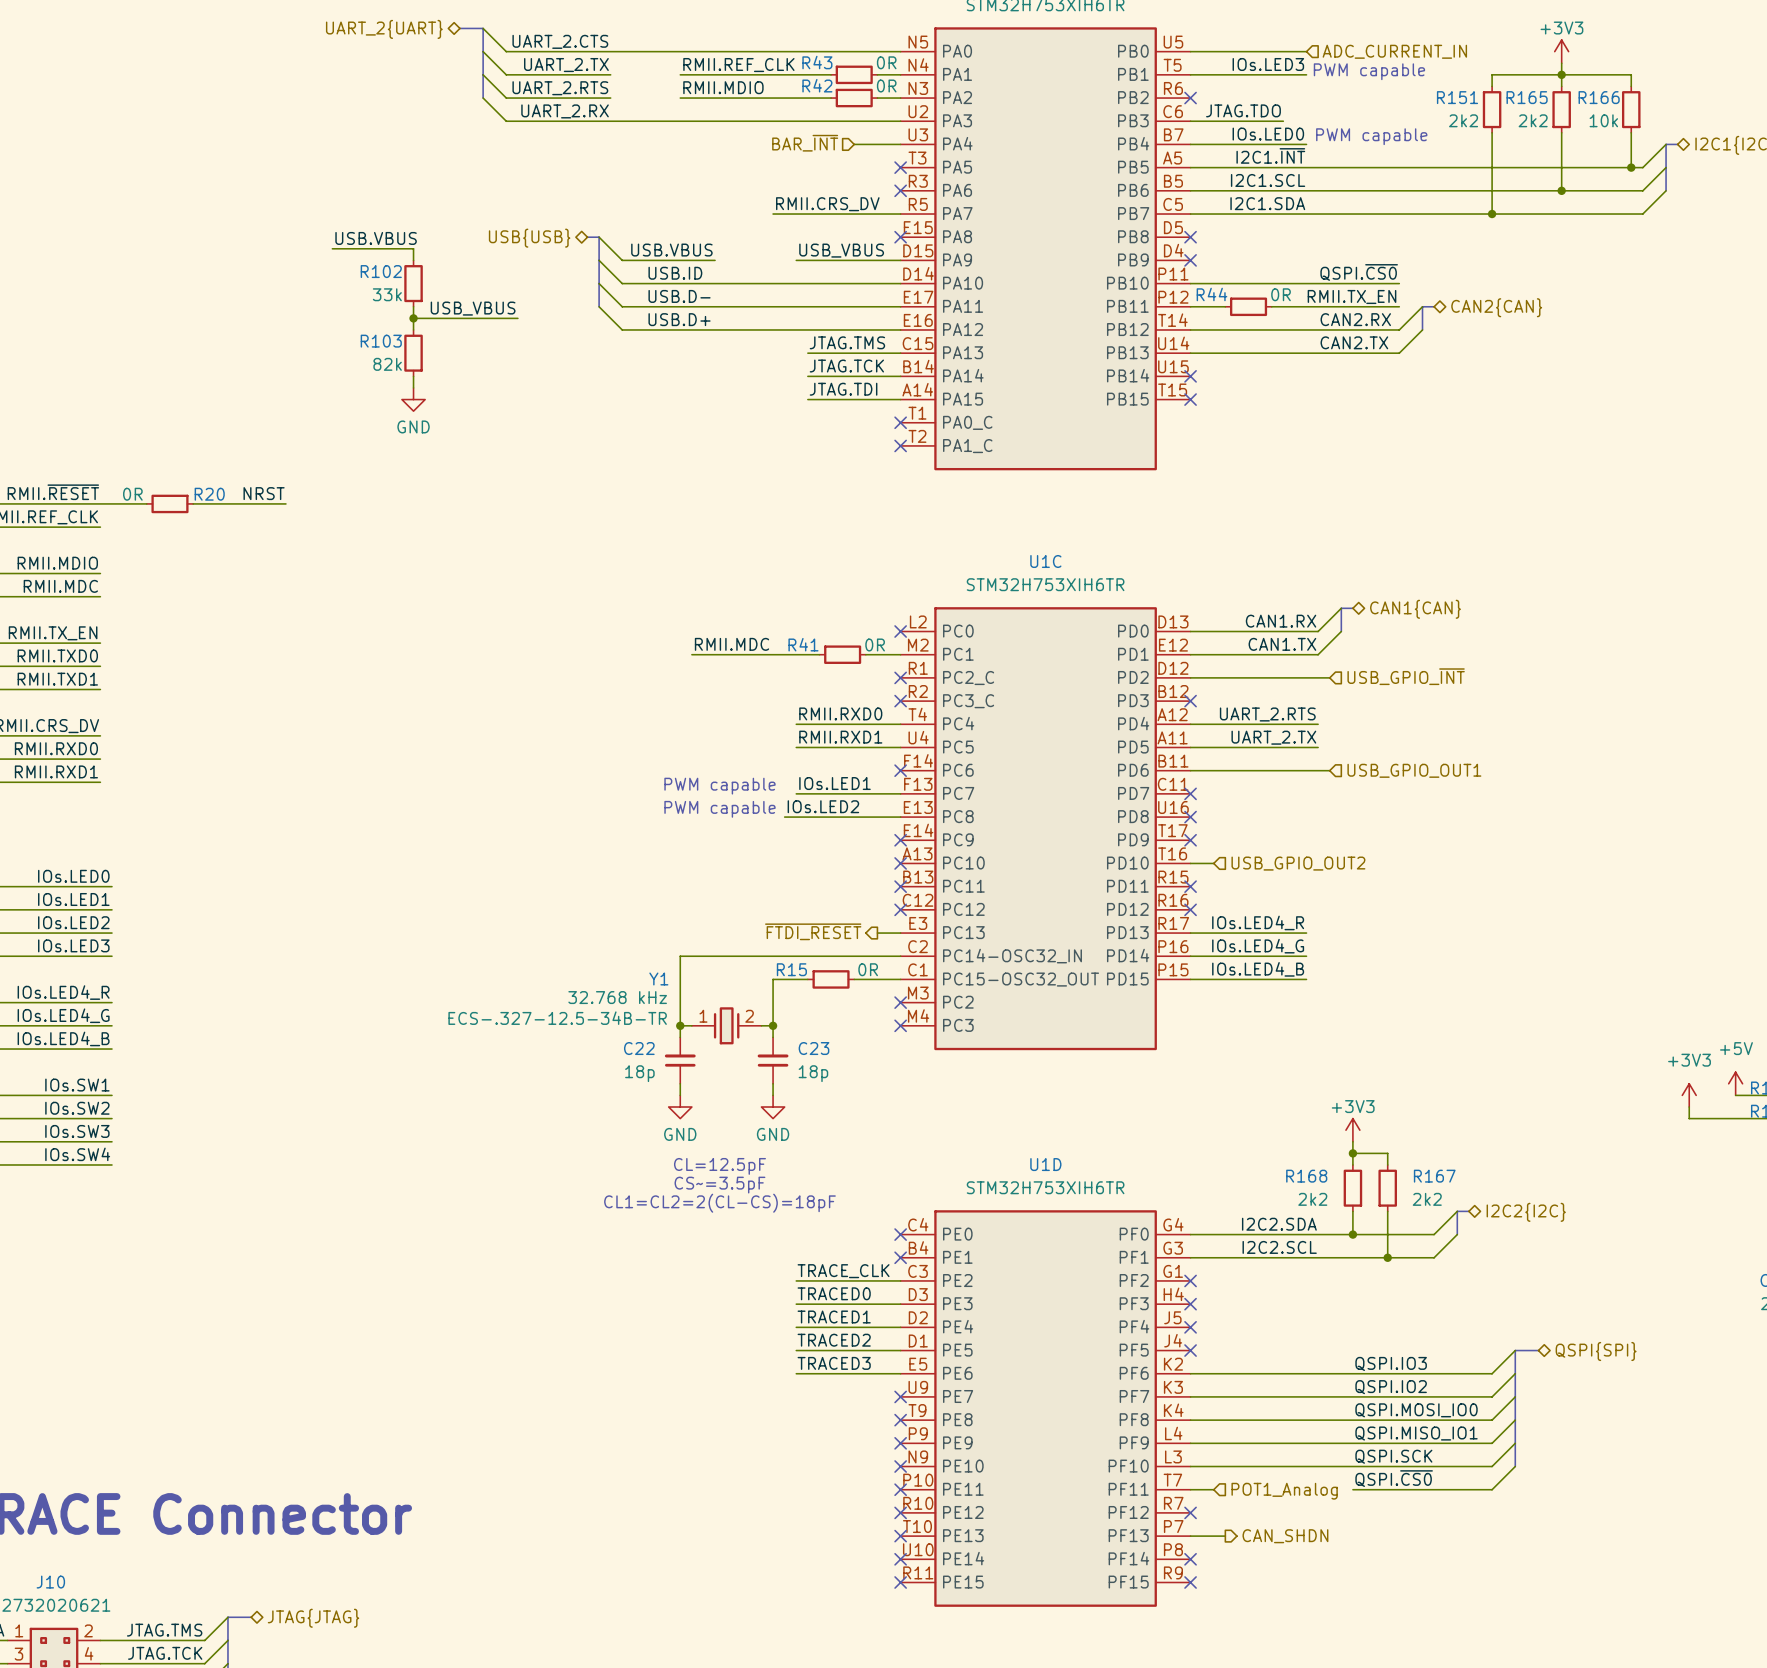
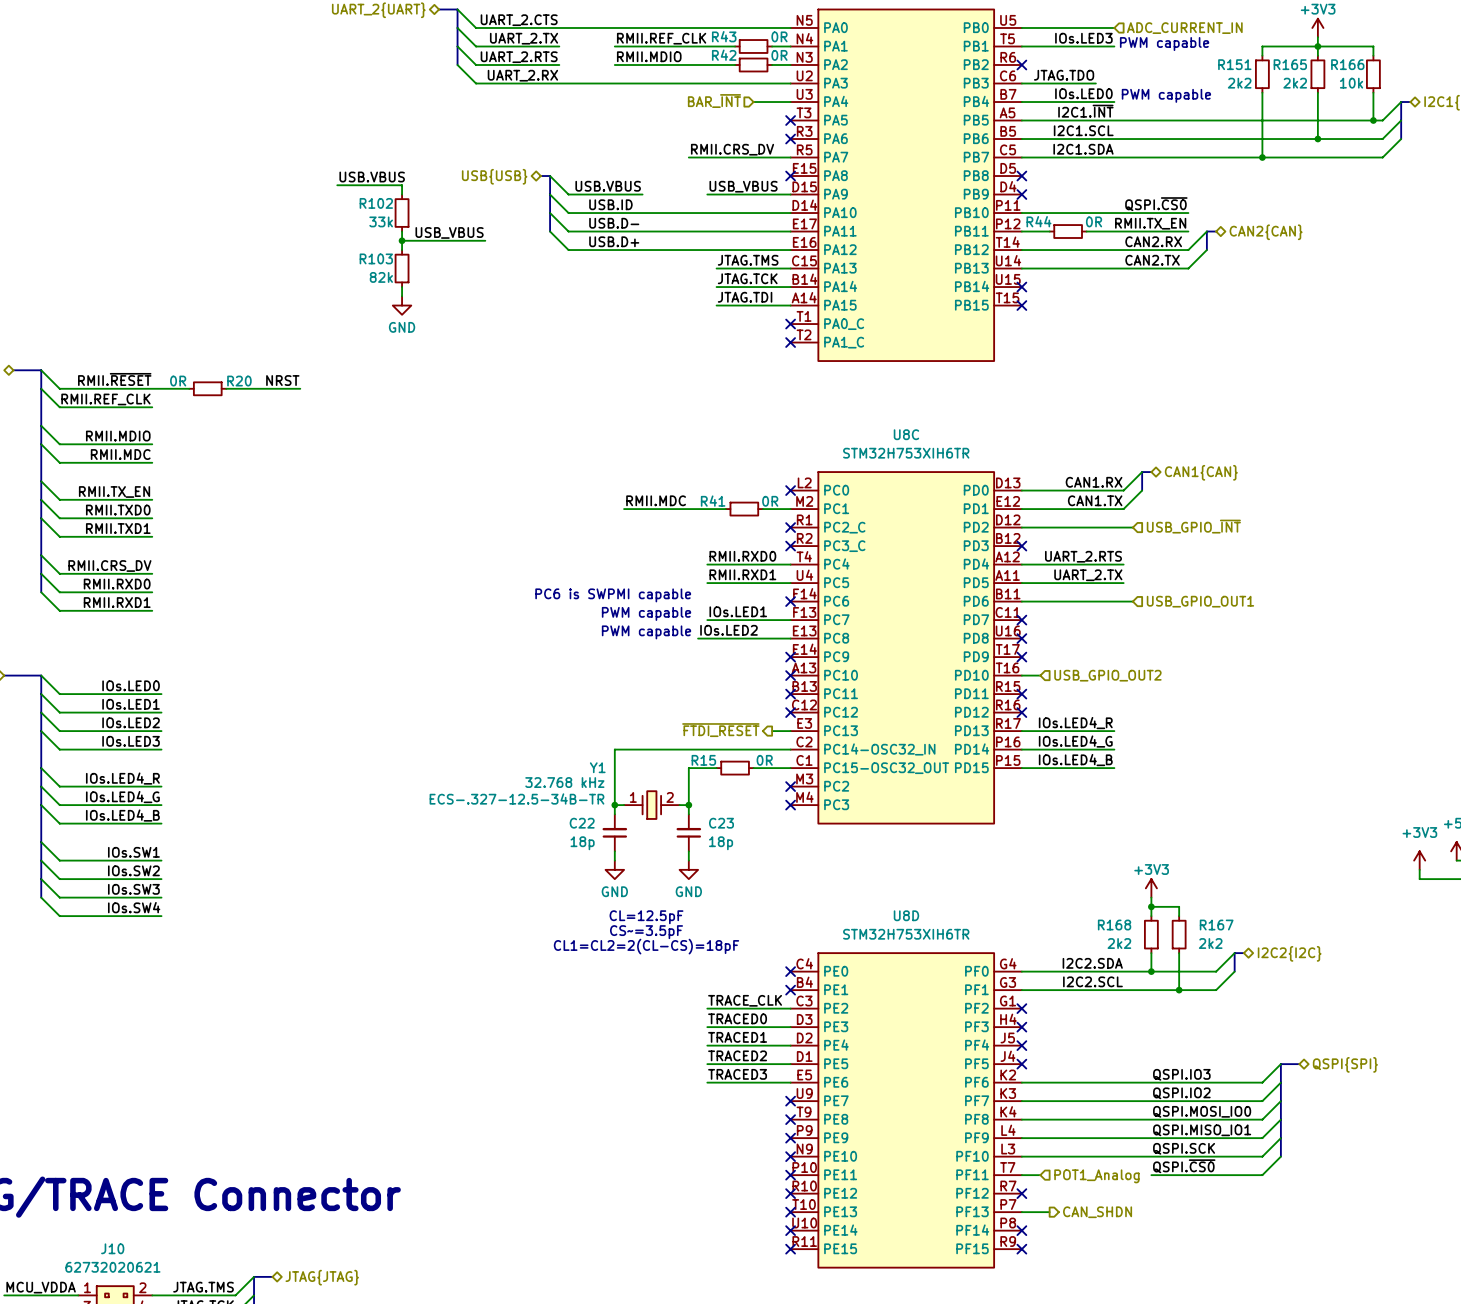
U1C name: U1C (1045, 561) -> U8C (906, 434)
text: none -> PC6 is SWPMI capable (613, 595)
U1D name: U1D (1045, 1164) -> U8D (906, 915)

